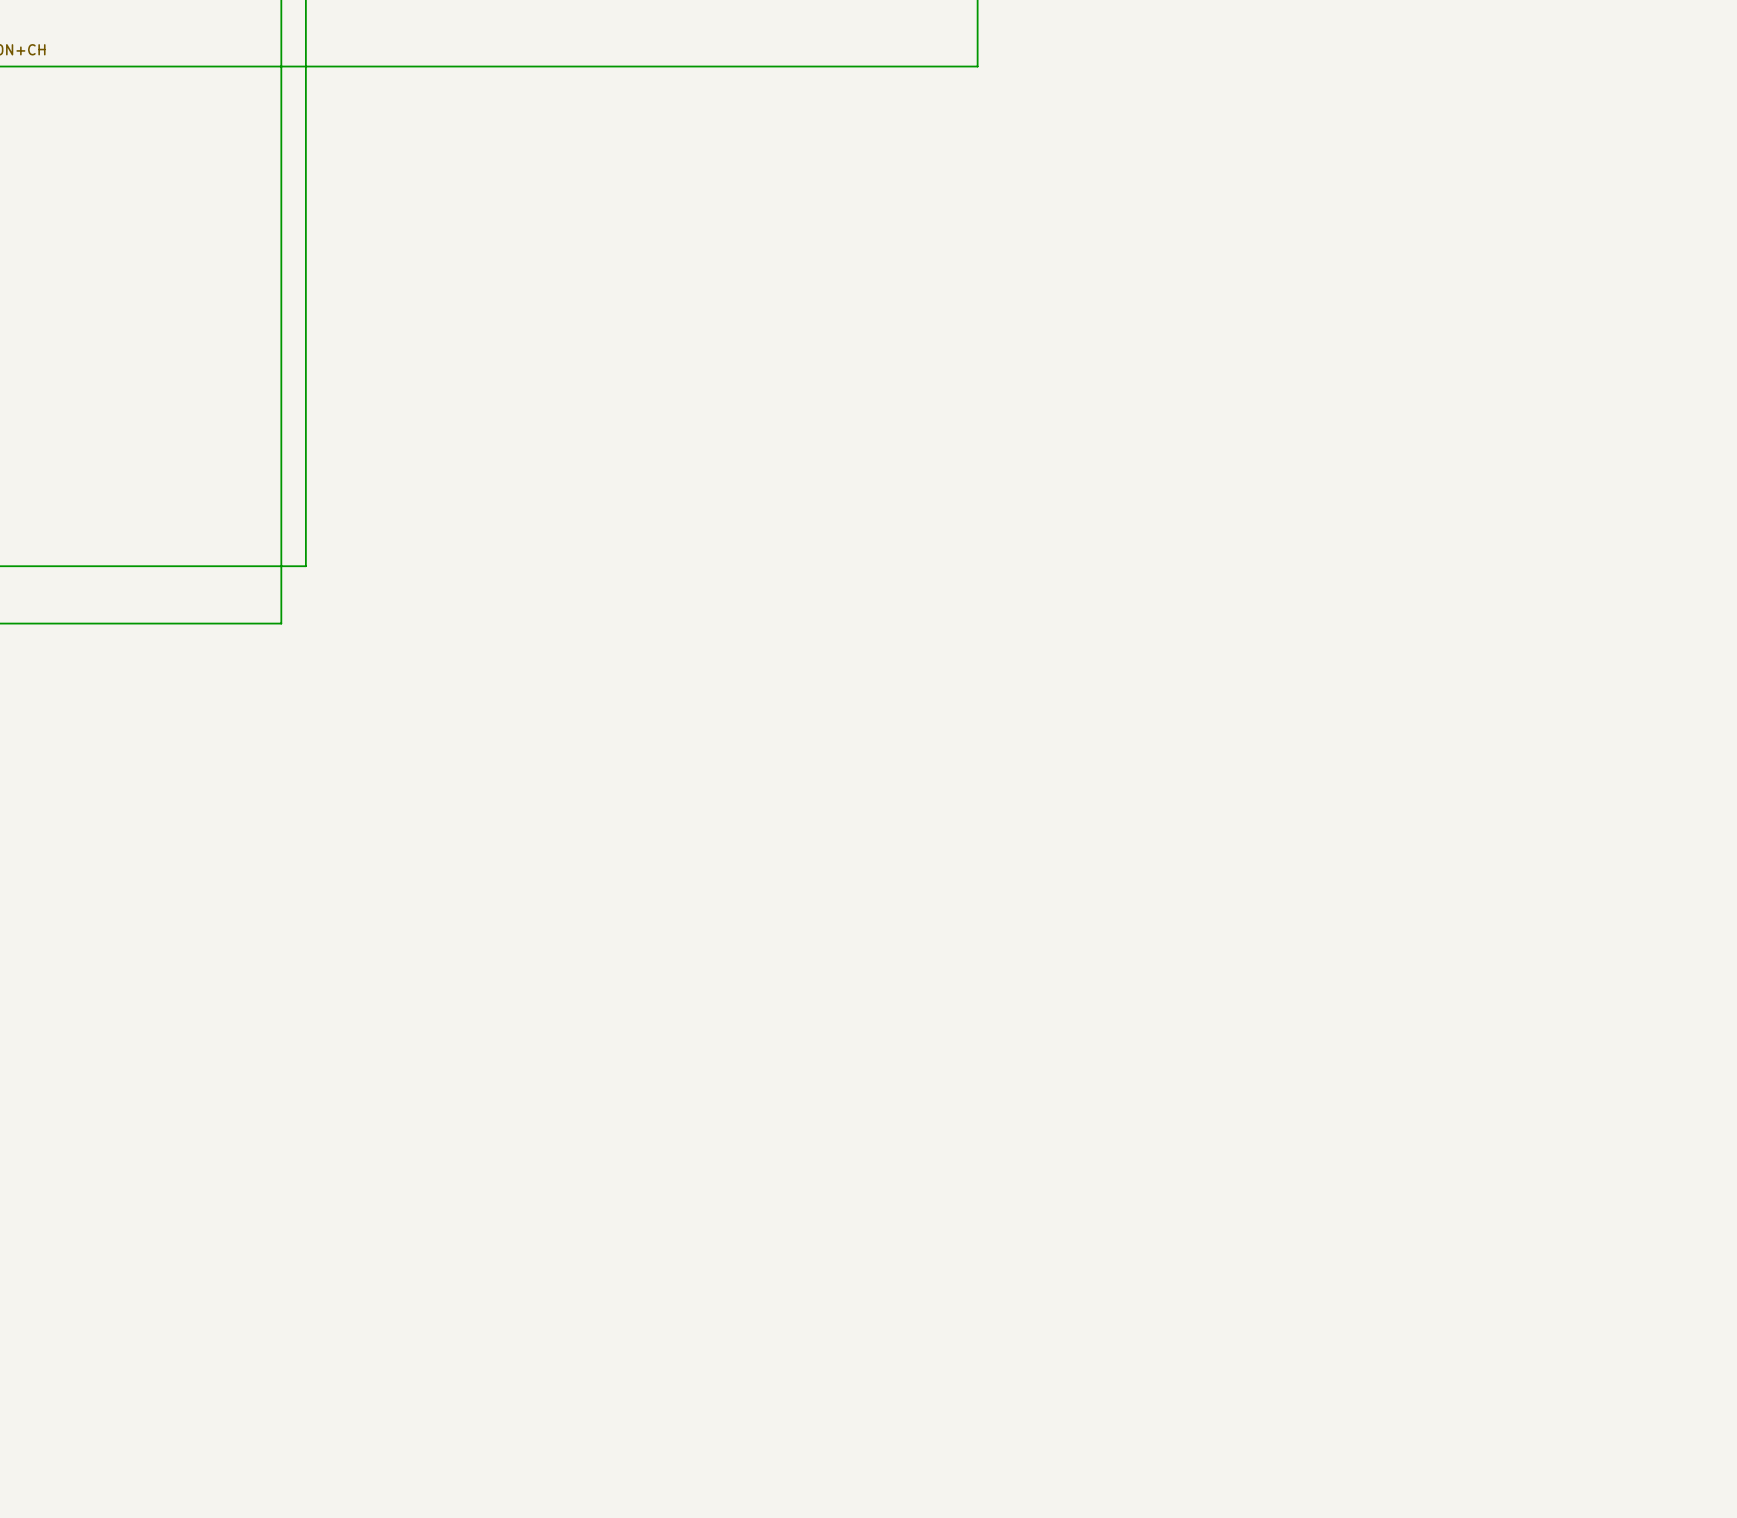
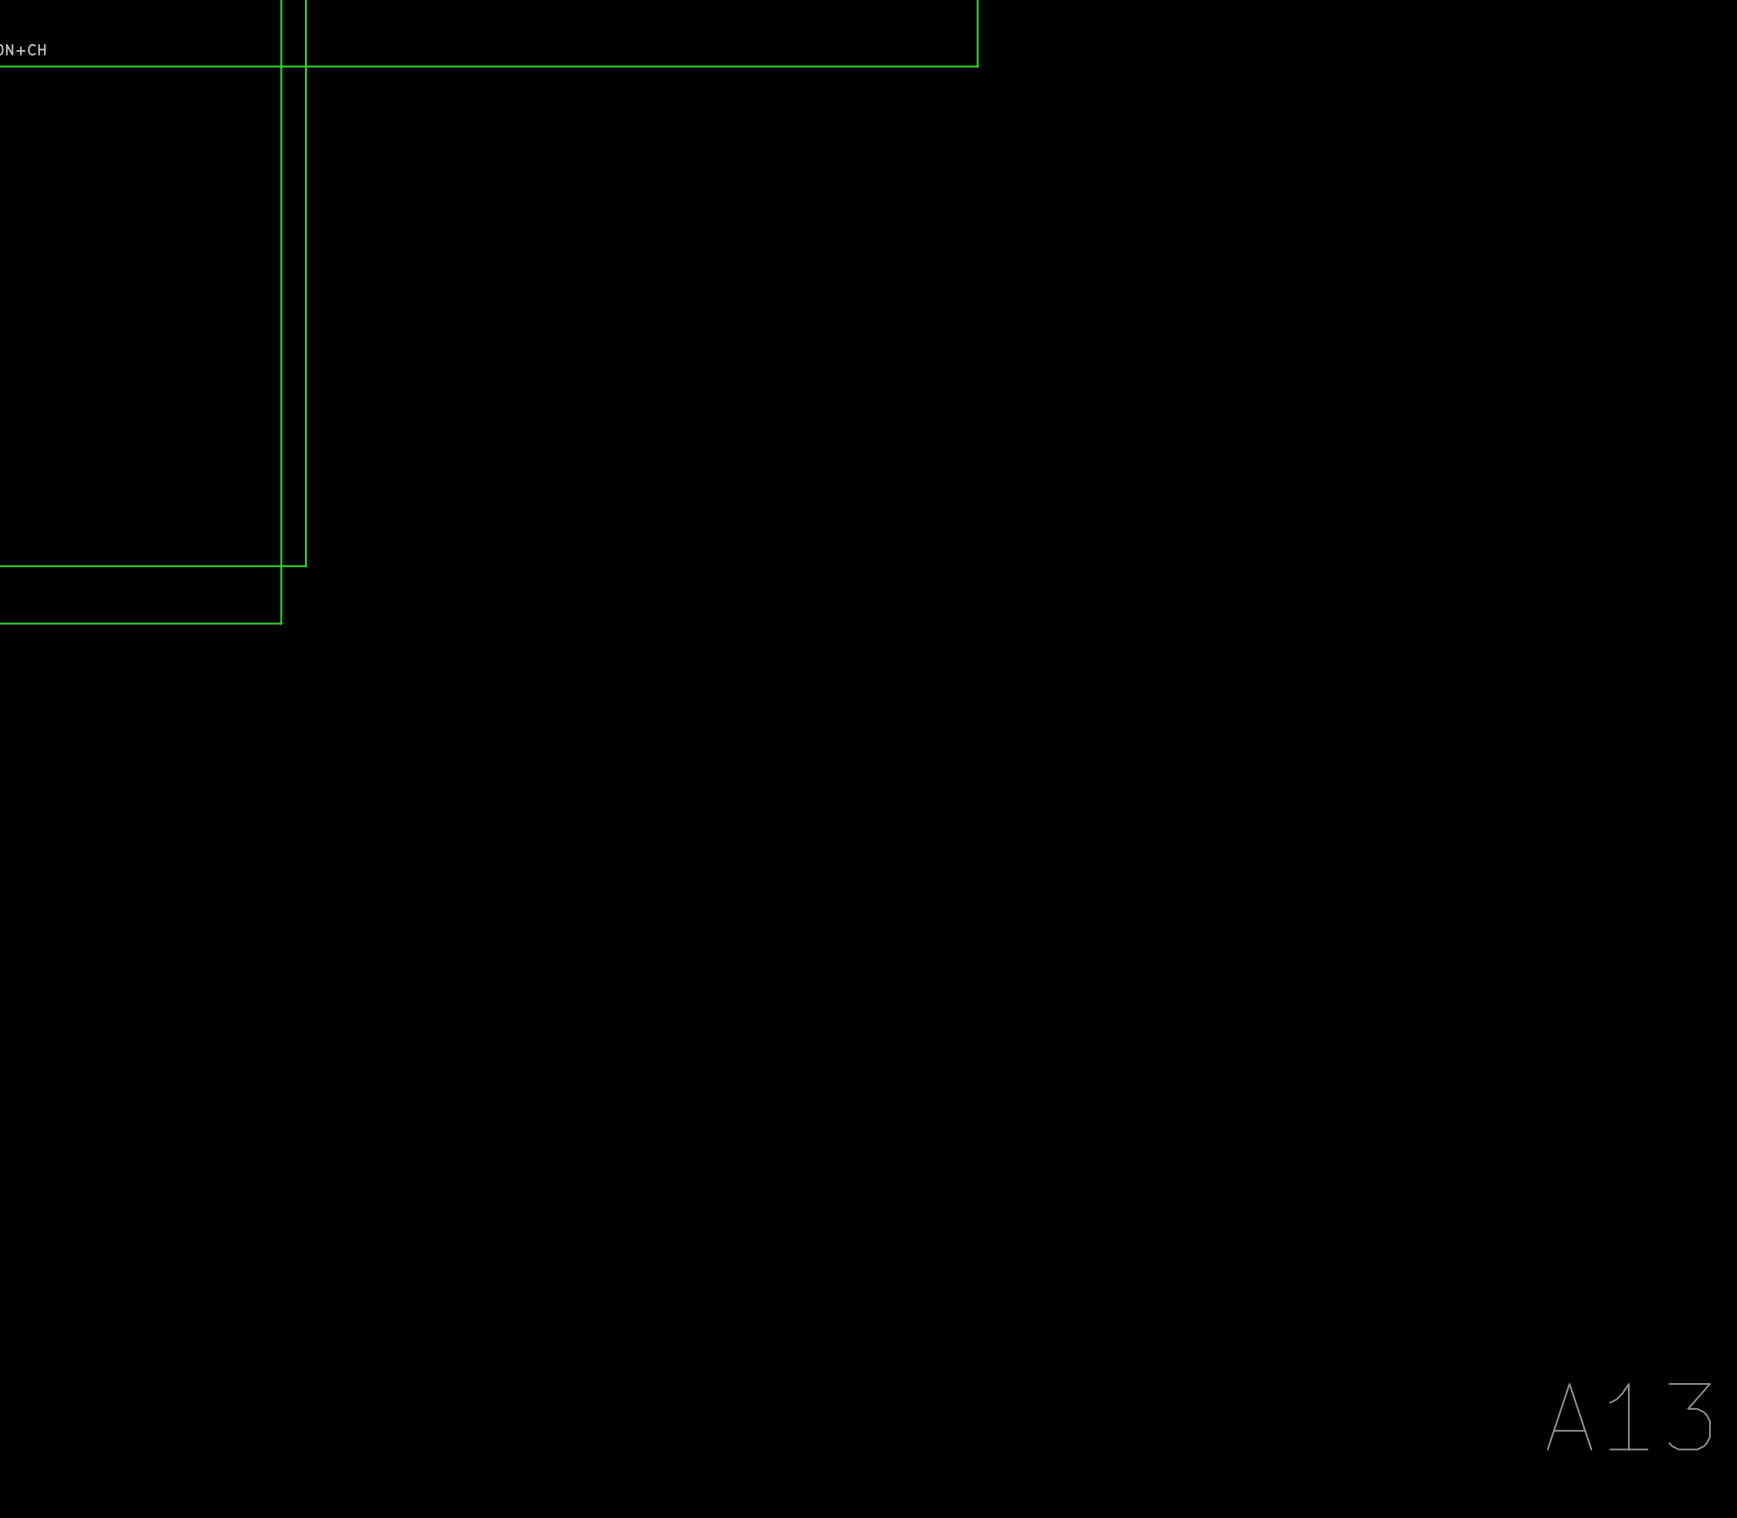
text: none -> A13 (1628, 1416)

